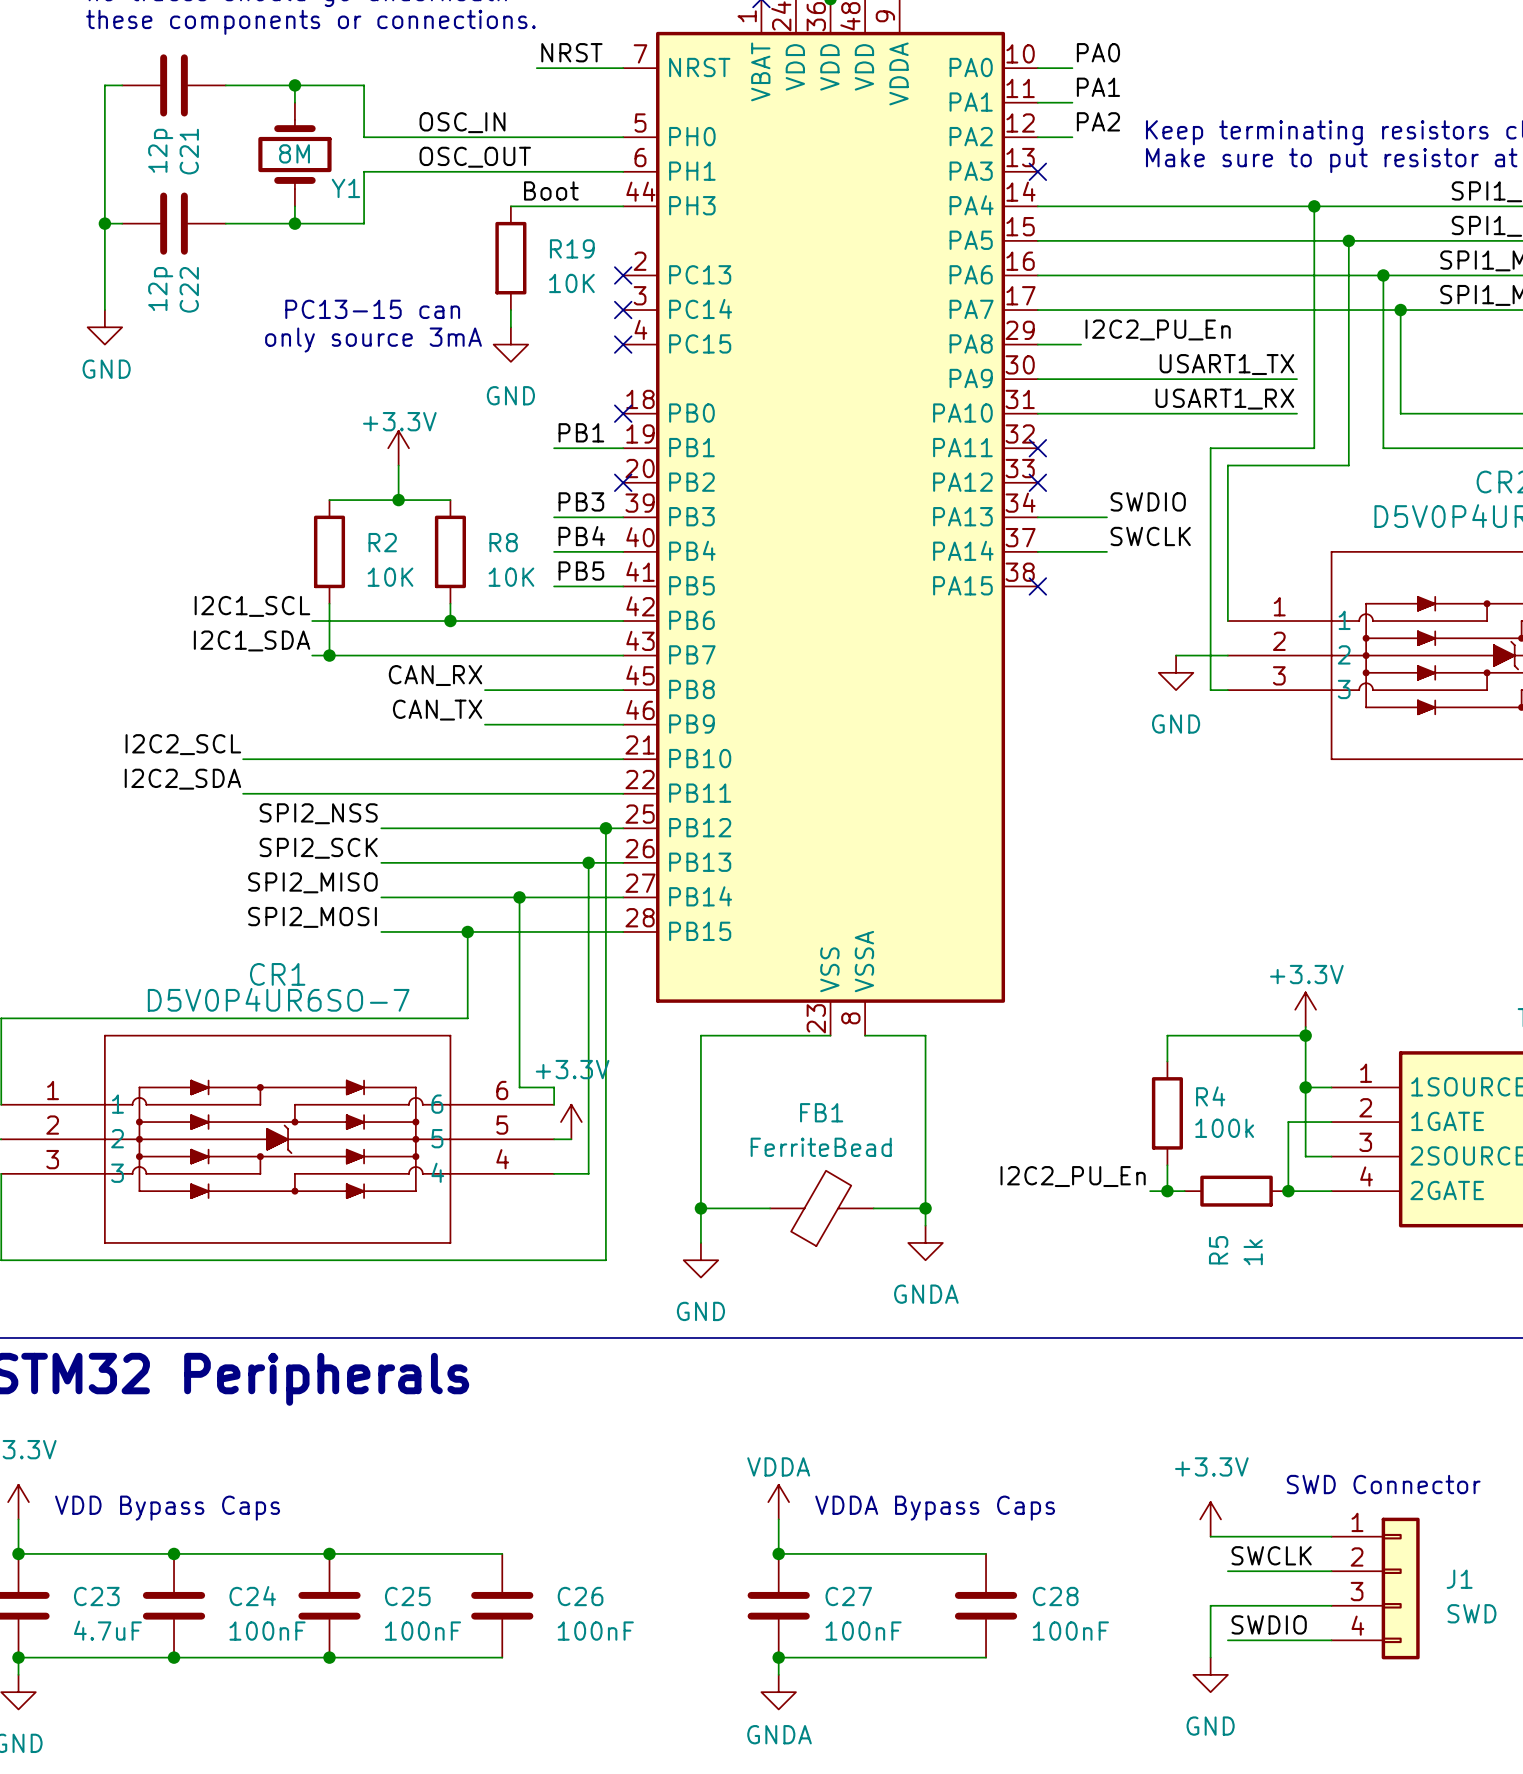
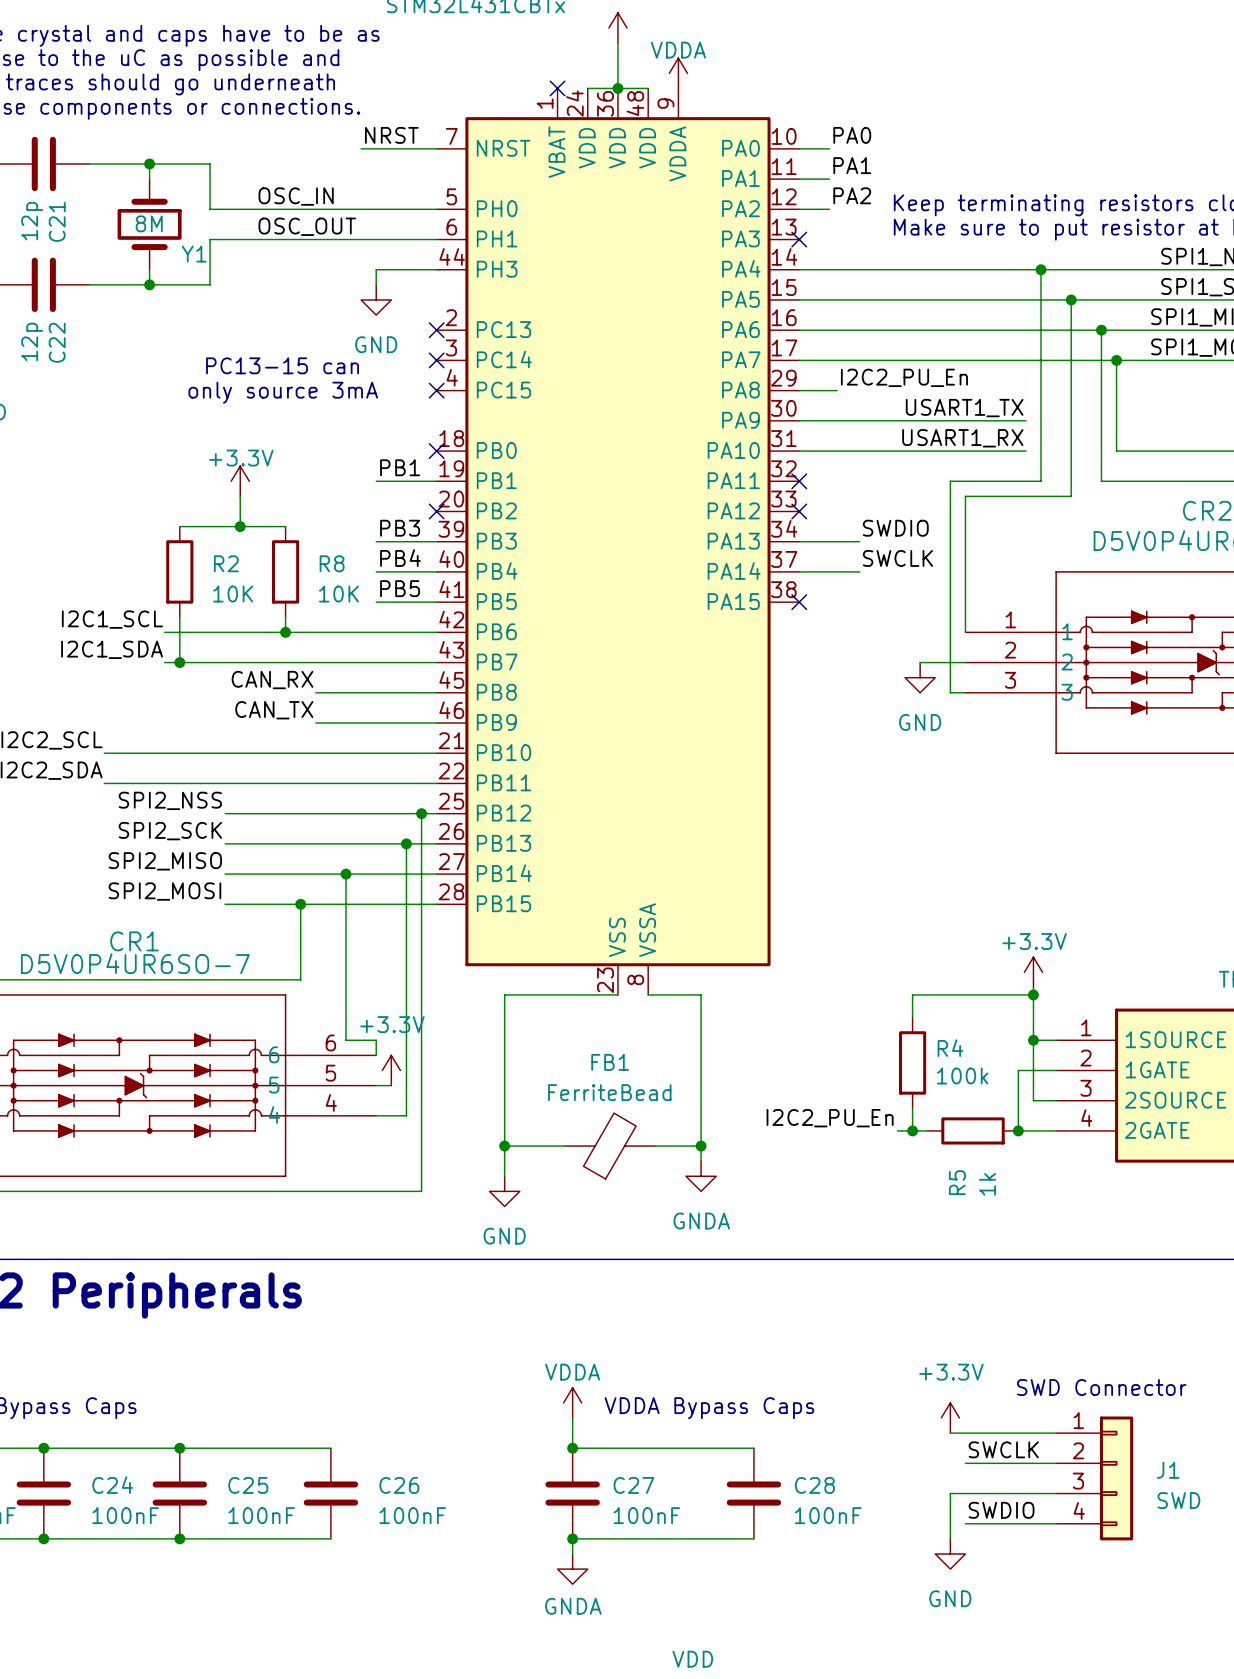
label: Boot (551, 190) -> none
wire: (510, 206) (554, 206) -> (376, 284) (376, 269)
R19: 10K (510, 258) -> none
text position: PC13-15 can (372, 309) -> PC13-15 can (282, 365)
wire: (510, 310) (510, 327) -> none
text position: only source 3mA (373, 340) -> only source 3mA (283, 392)
power symbol position: GND (510, 344) -> GND (376, 299)

